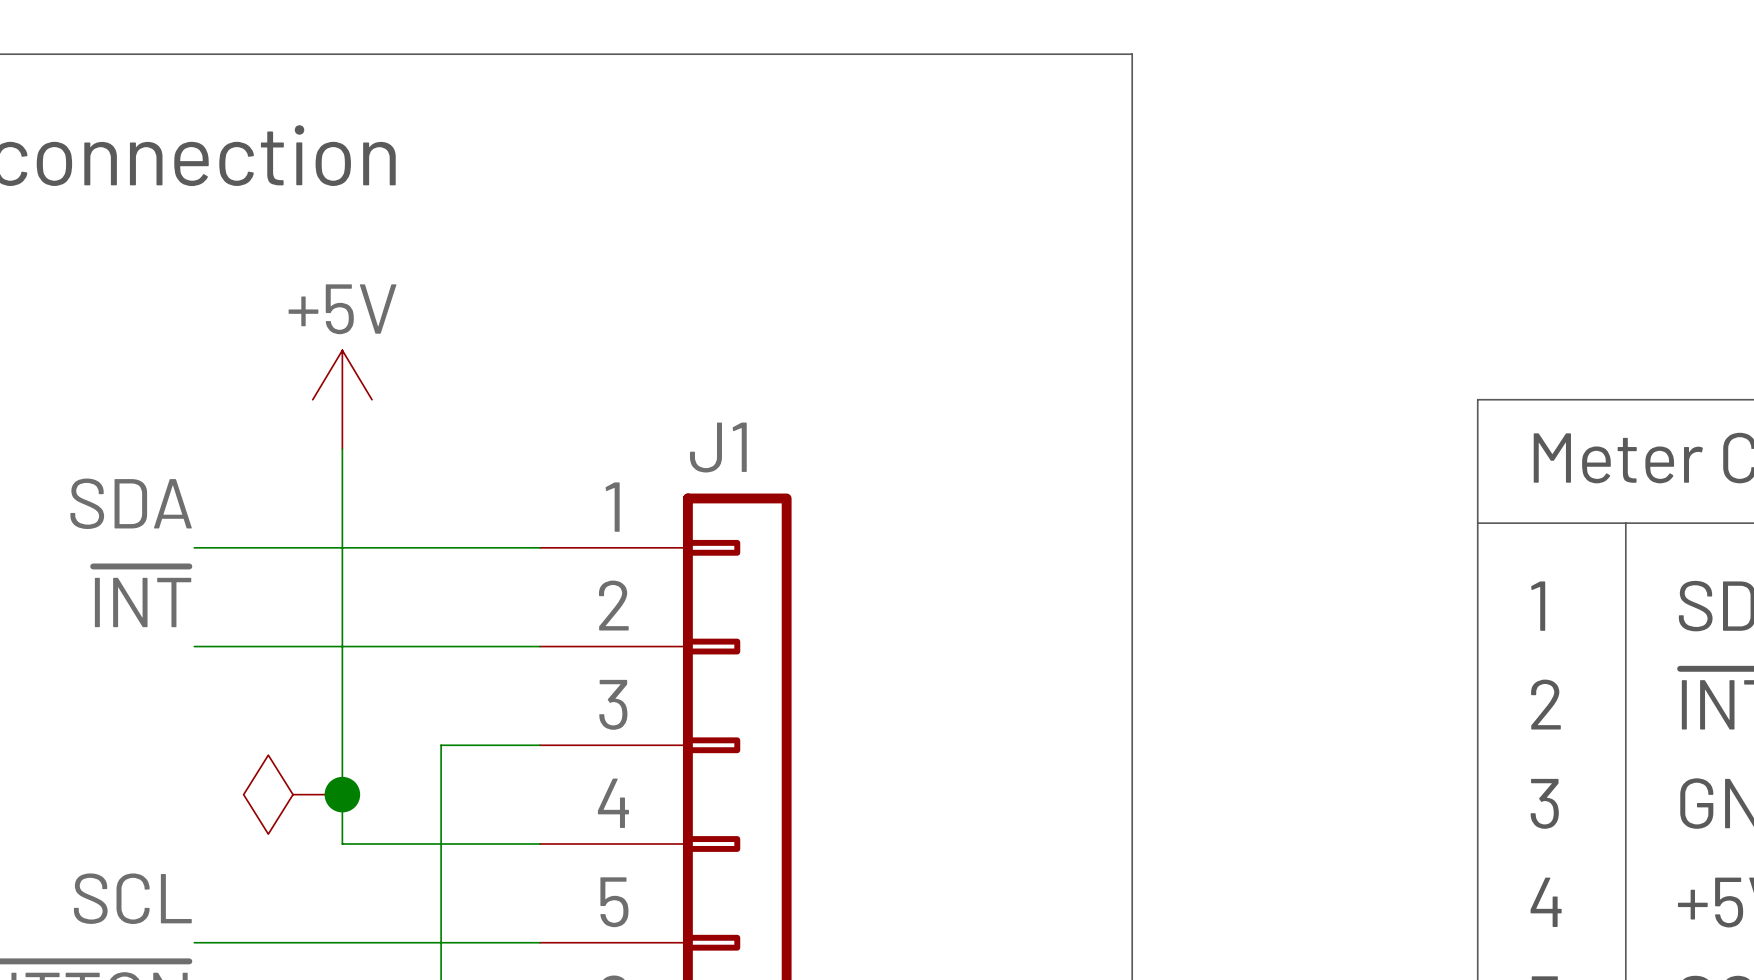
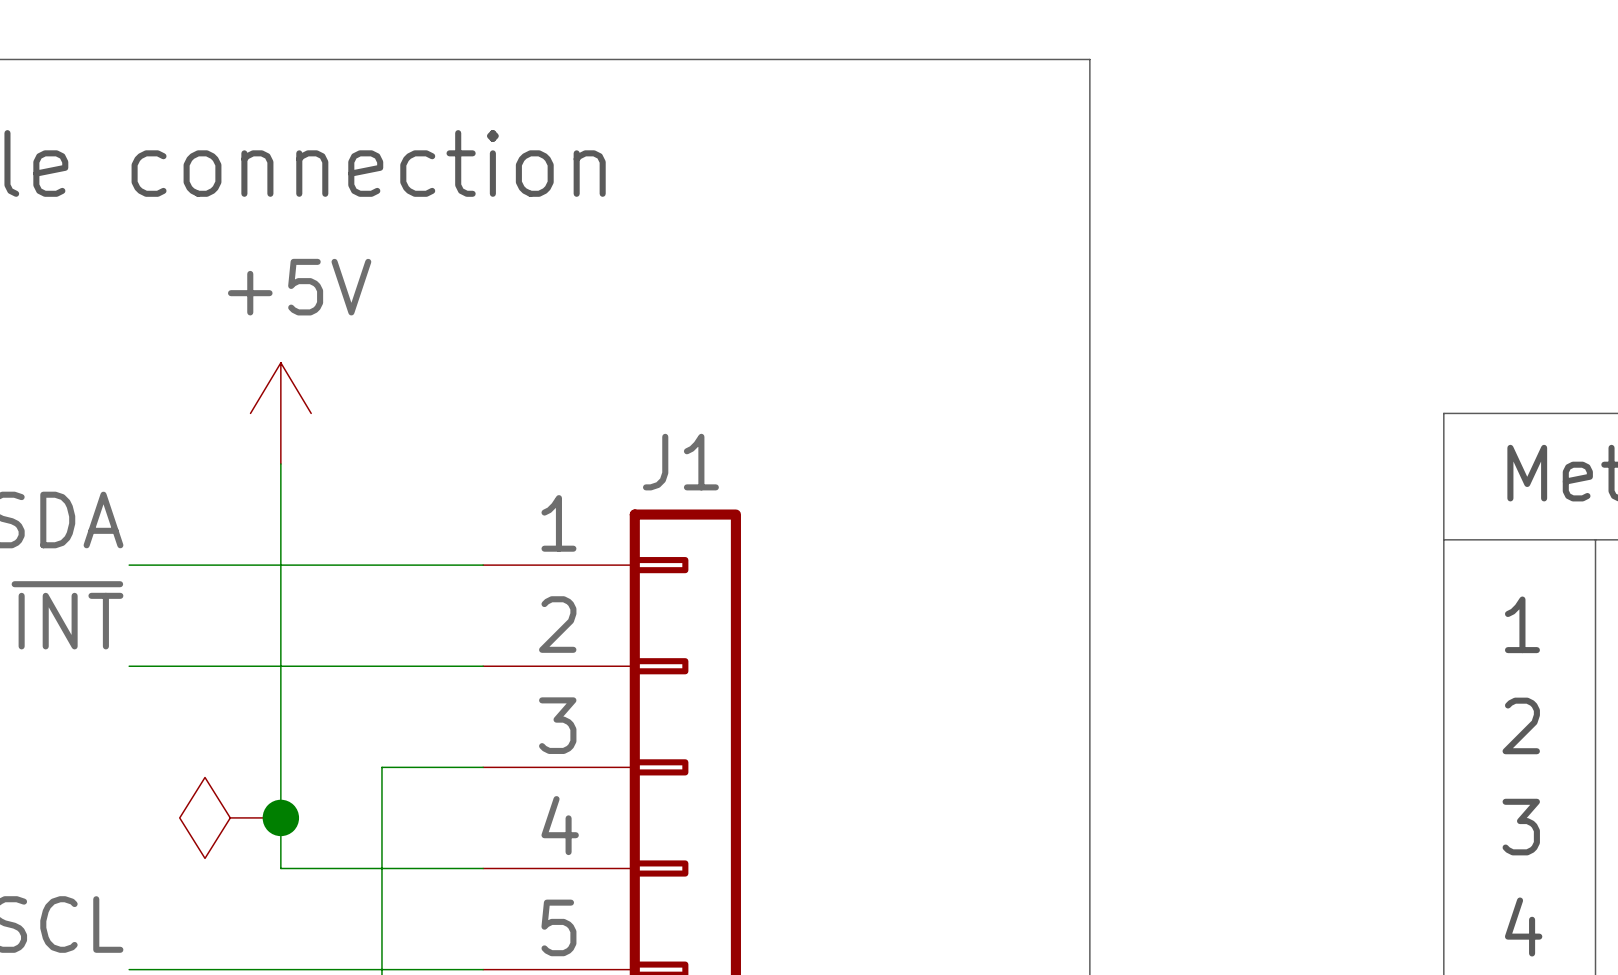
power symbol text position: +5V (342, 309) -> +5V (299, 287)

